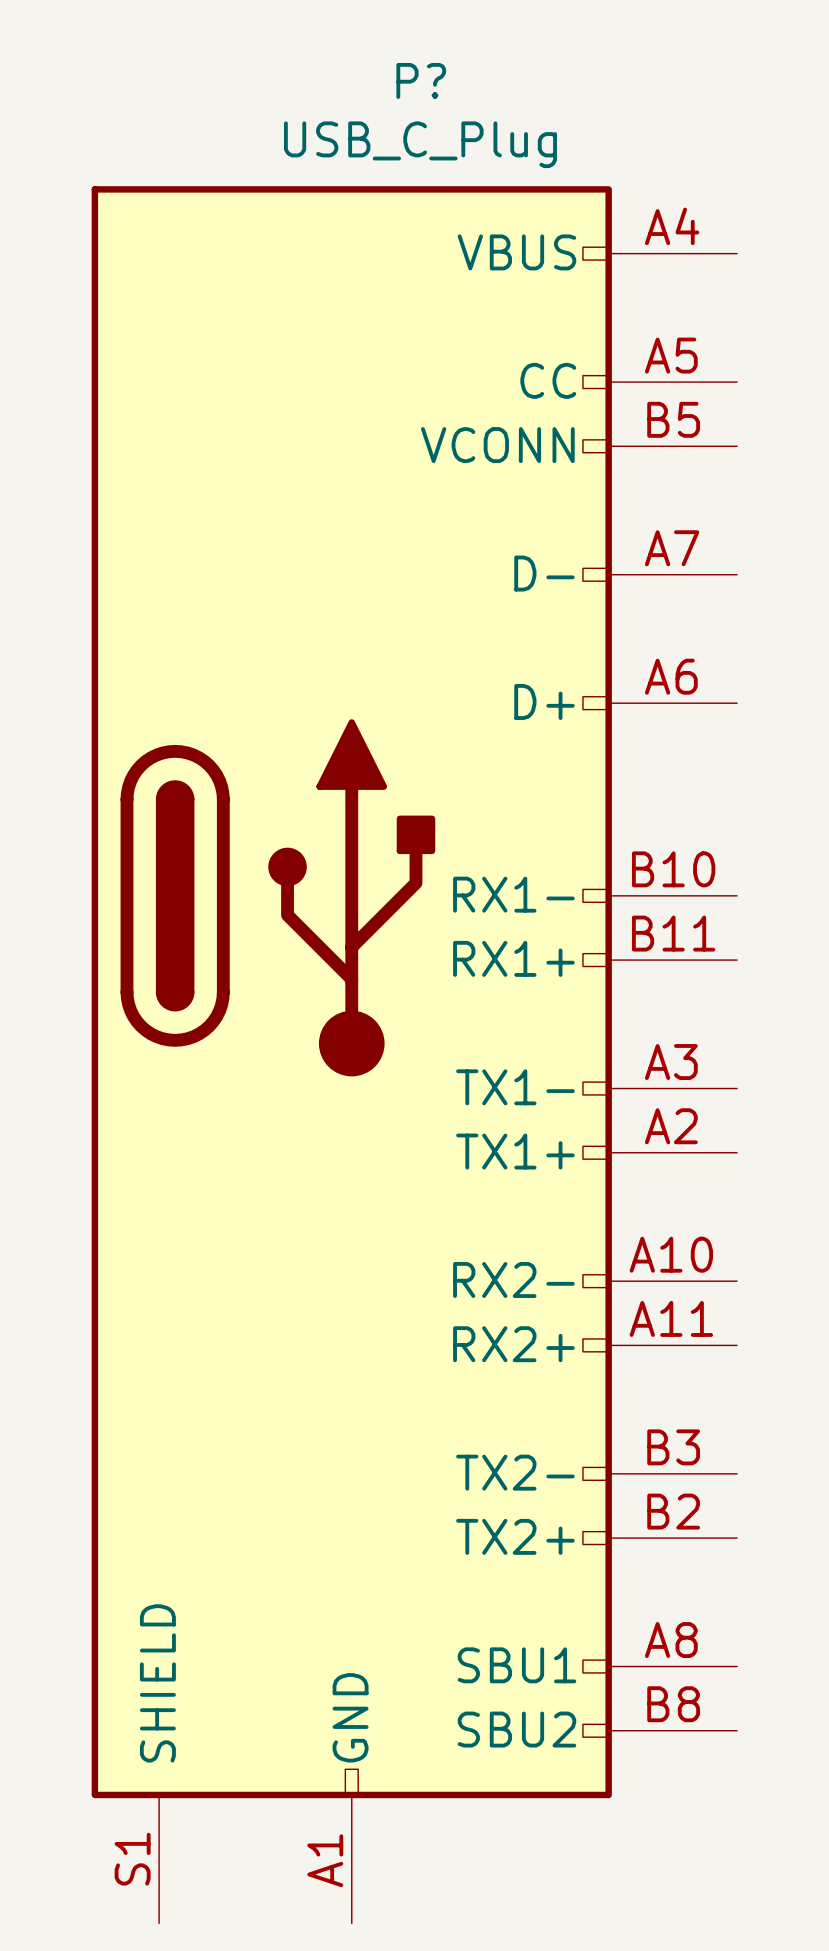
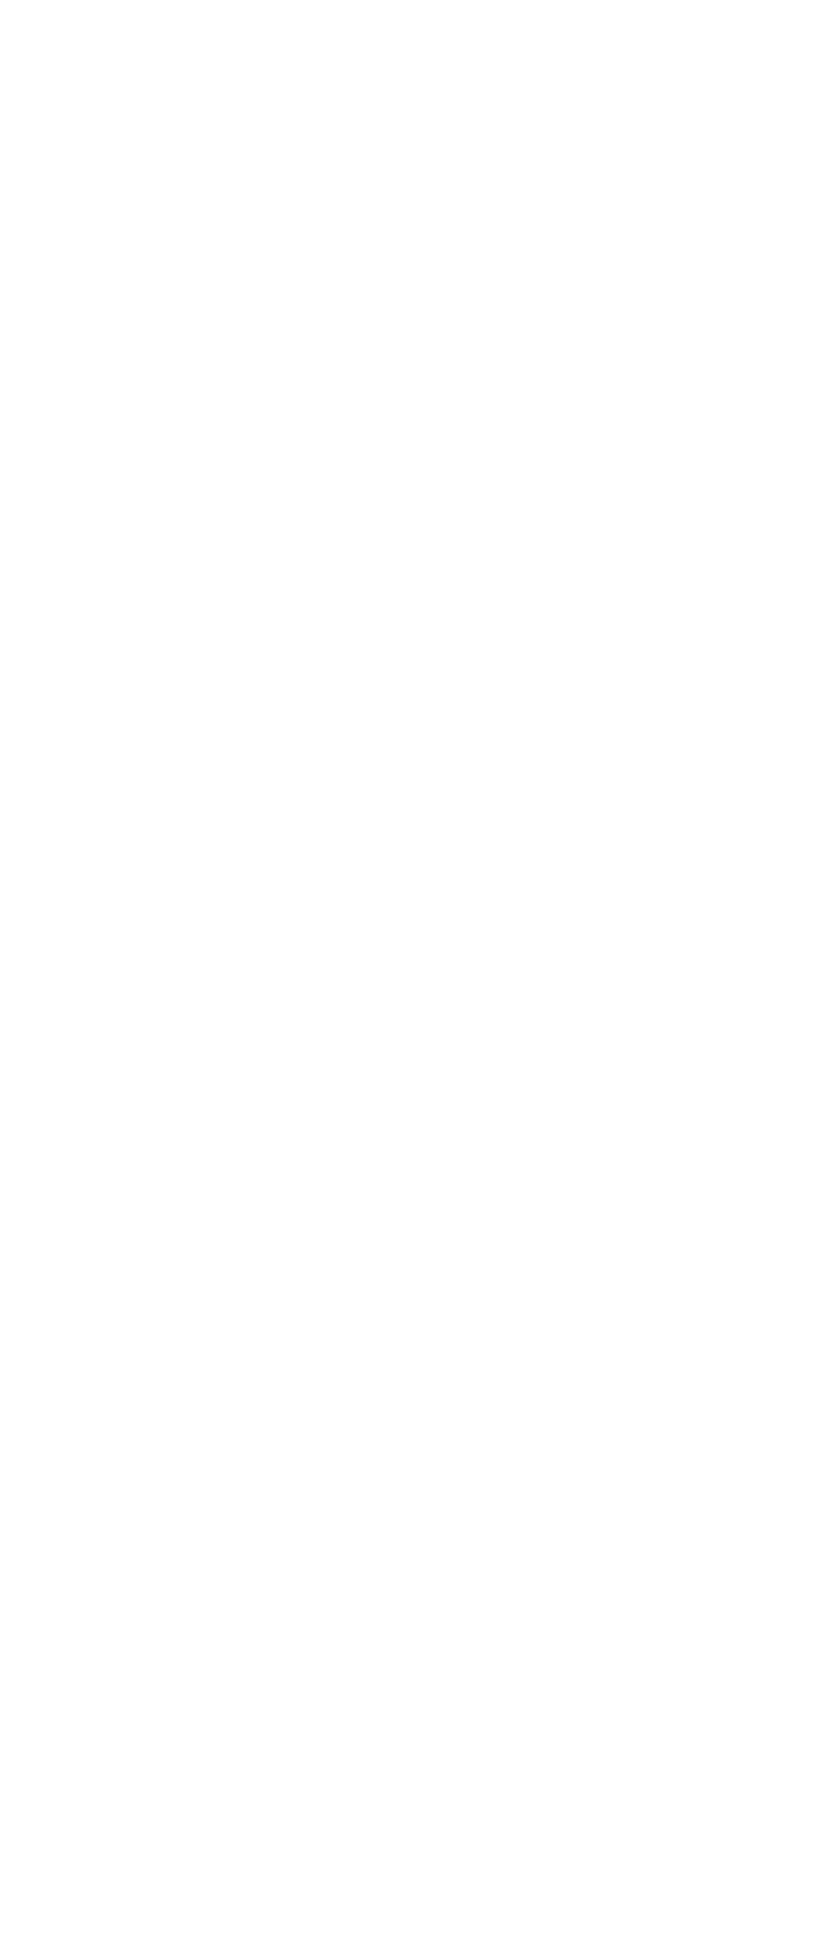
P?: USB_C_Plug (414, 1054) -> none

